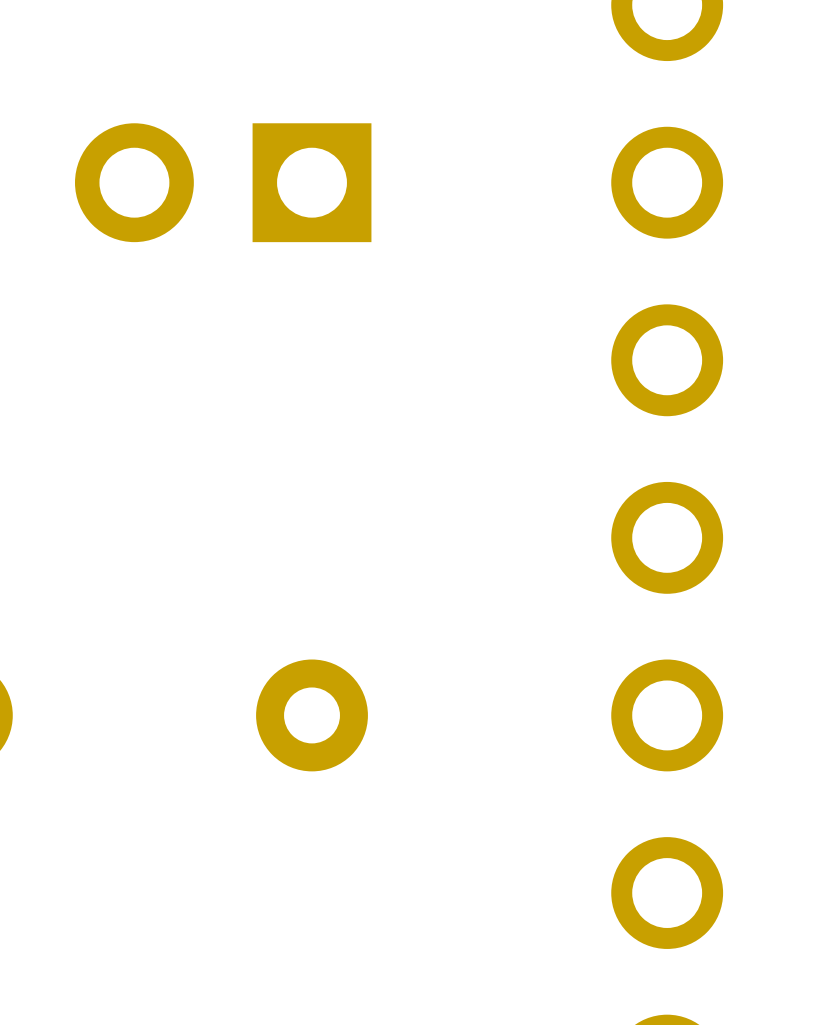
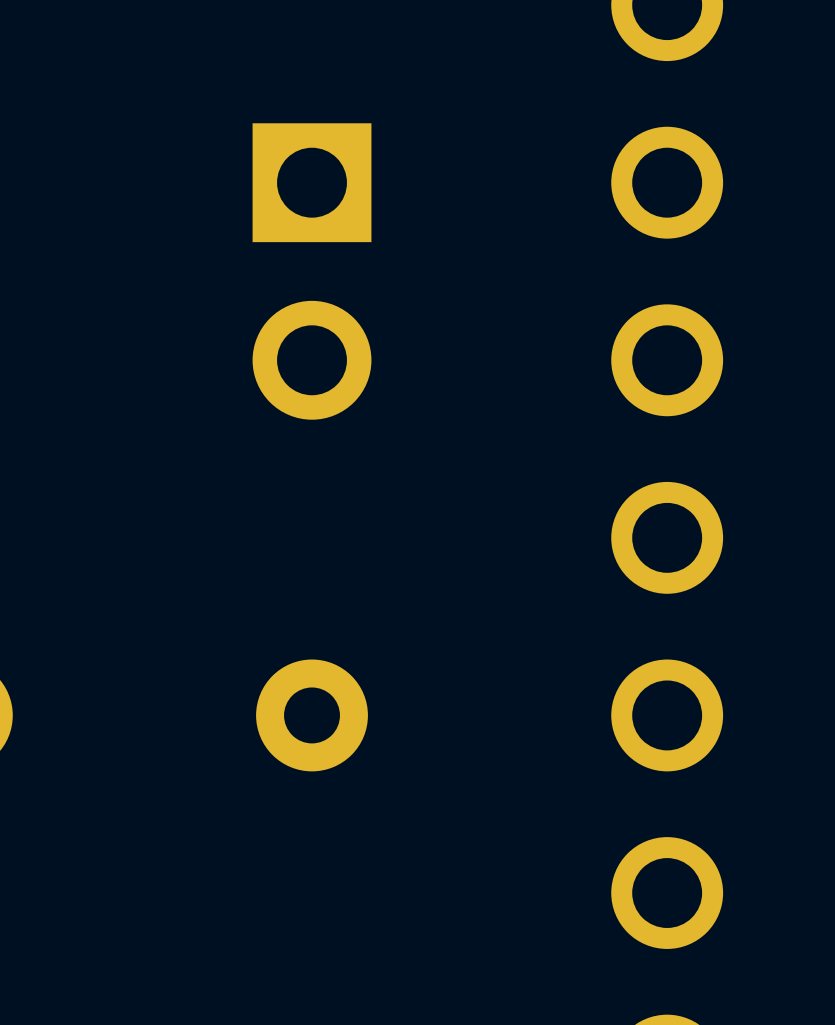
part rotation: 0° (223, 182) -> 90° counterclockwise (312, 271)

